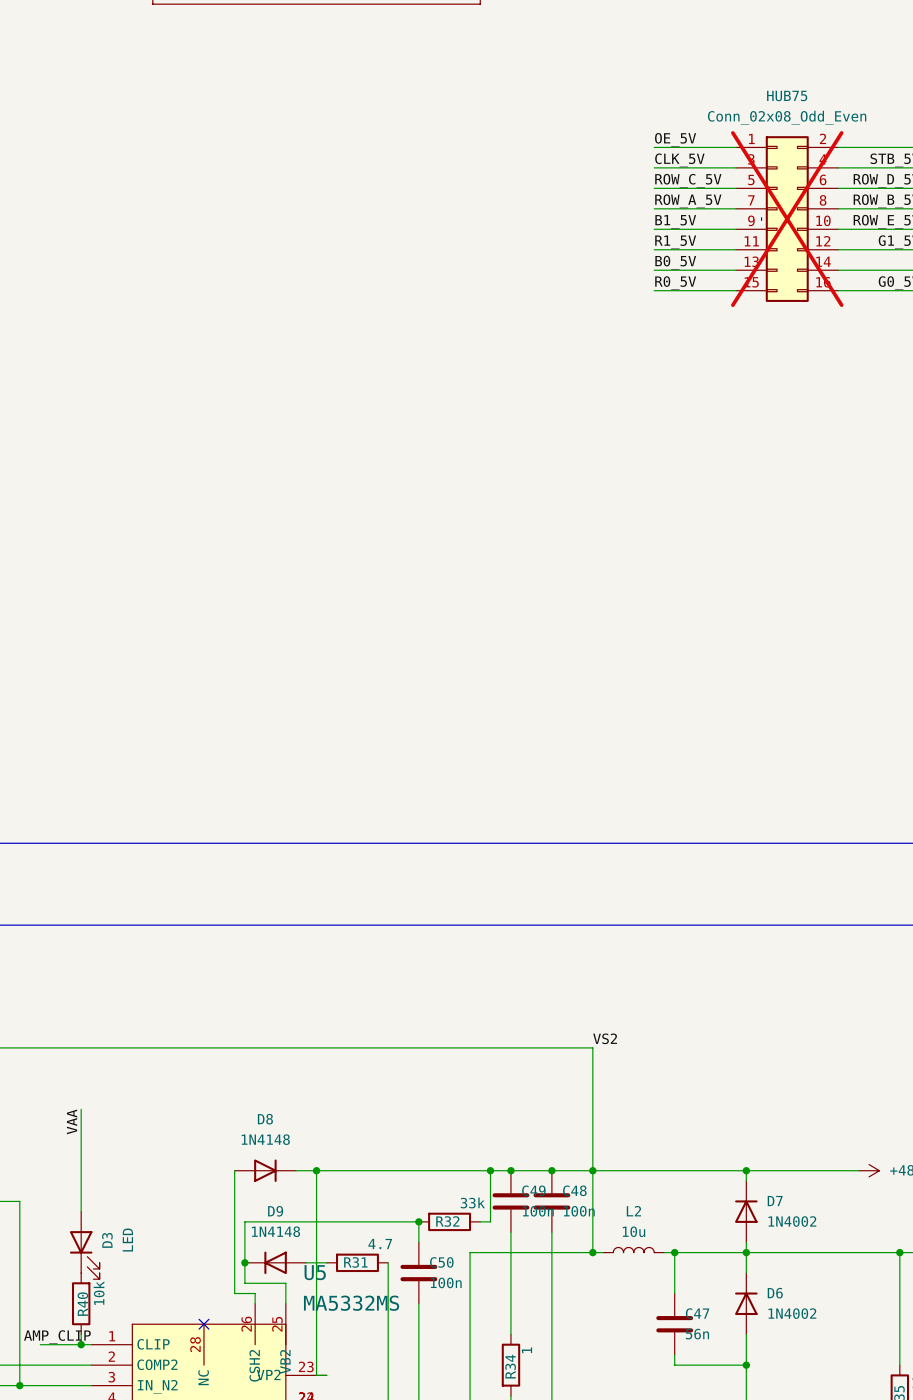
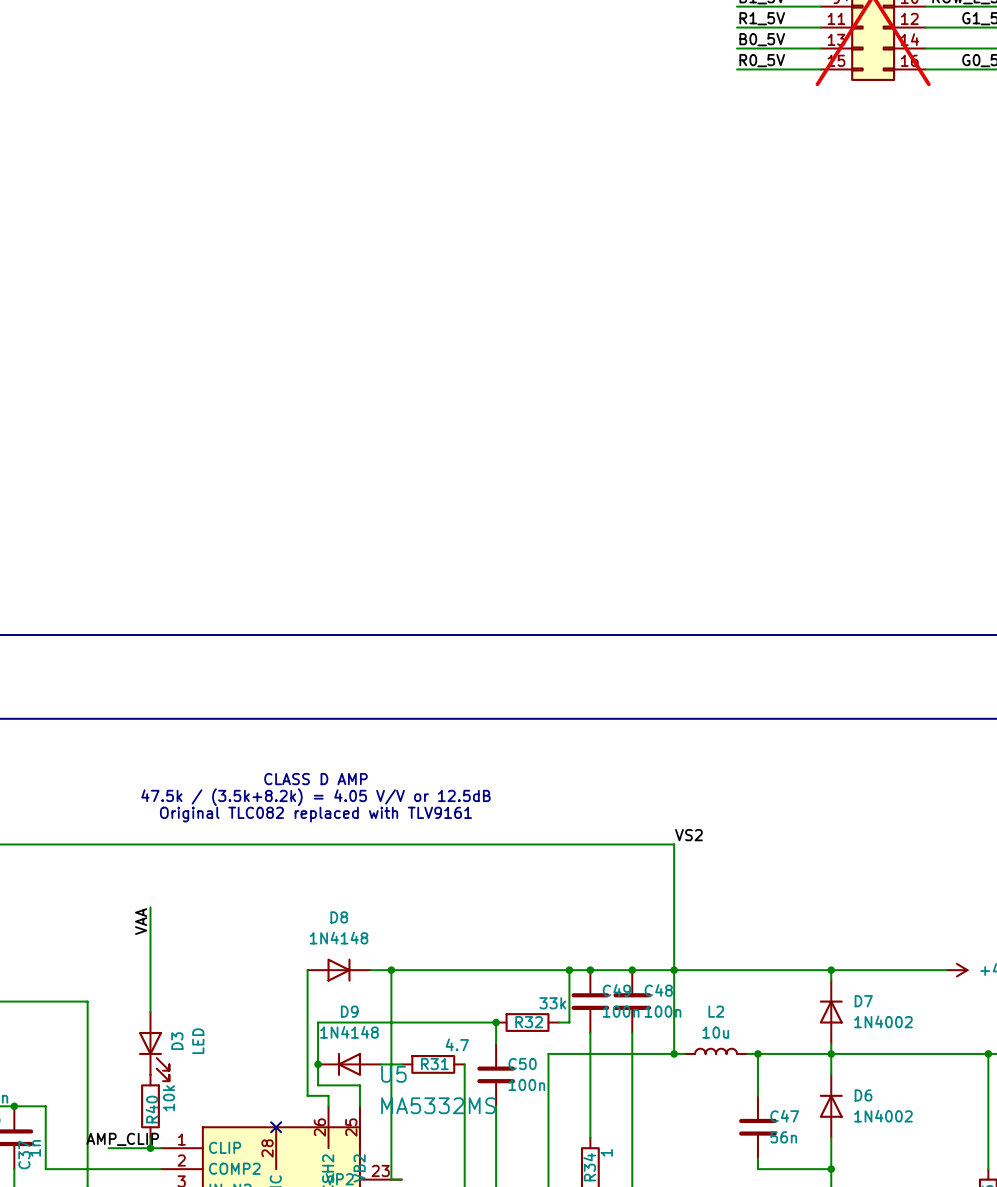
text: none -> CLASS D AMP (315, 779)
text: none -> 47.5k / (3.5k+8.2k) = 4.05 V/V or 12.5dB (315, 797)
text: none -> Original TLC082 replaced with TLV9161 (315, 814)

